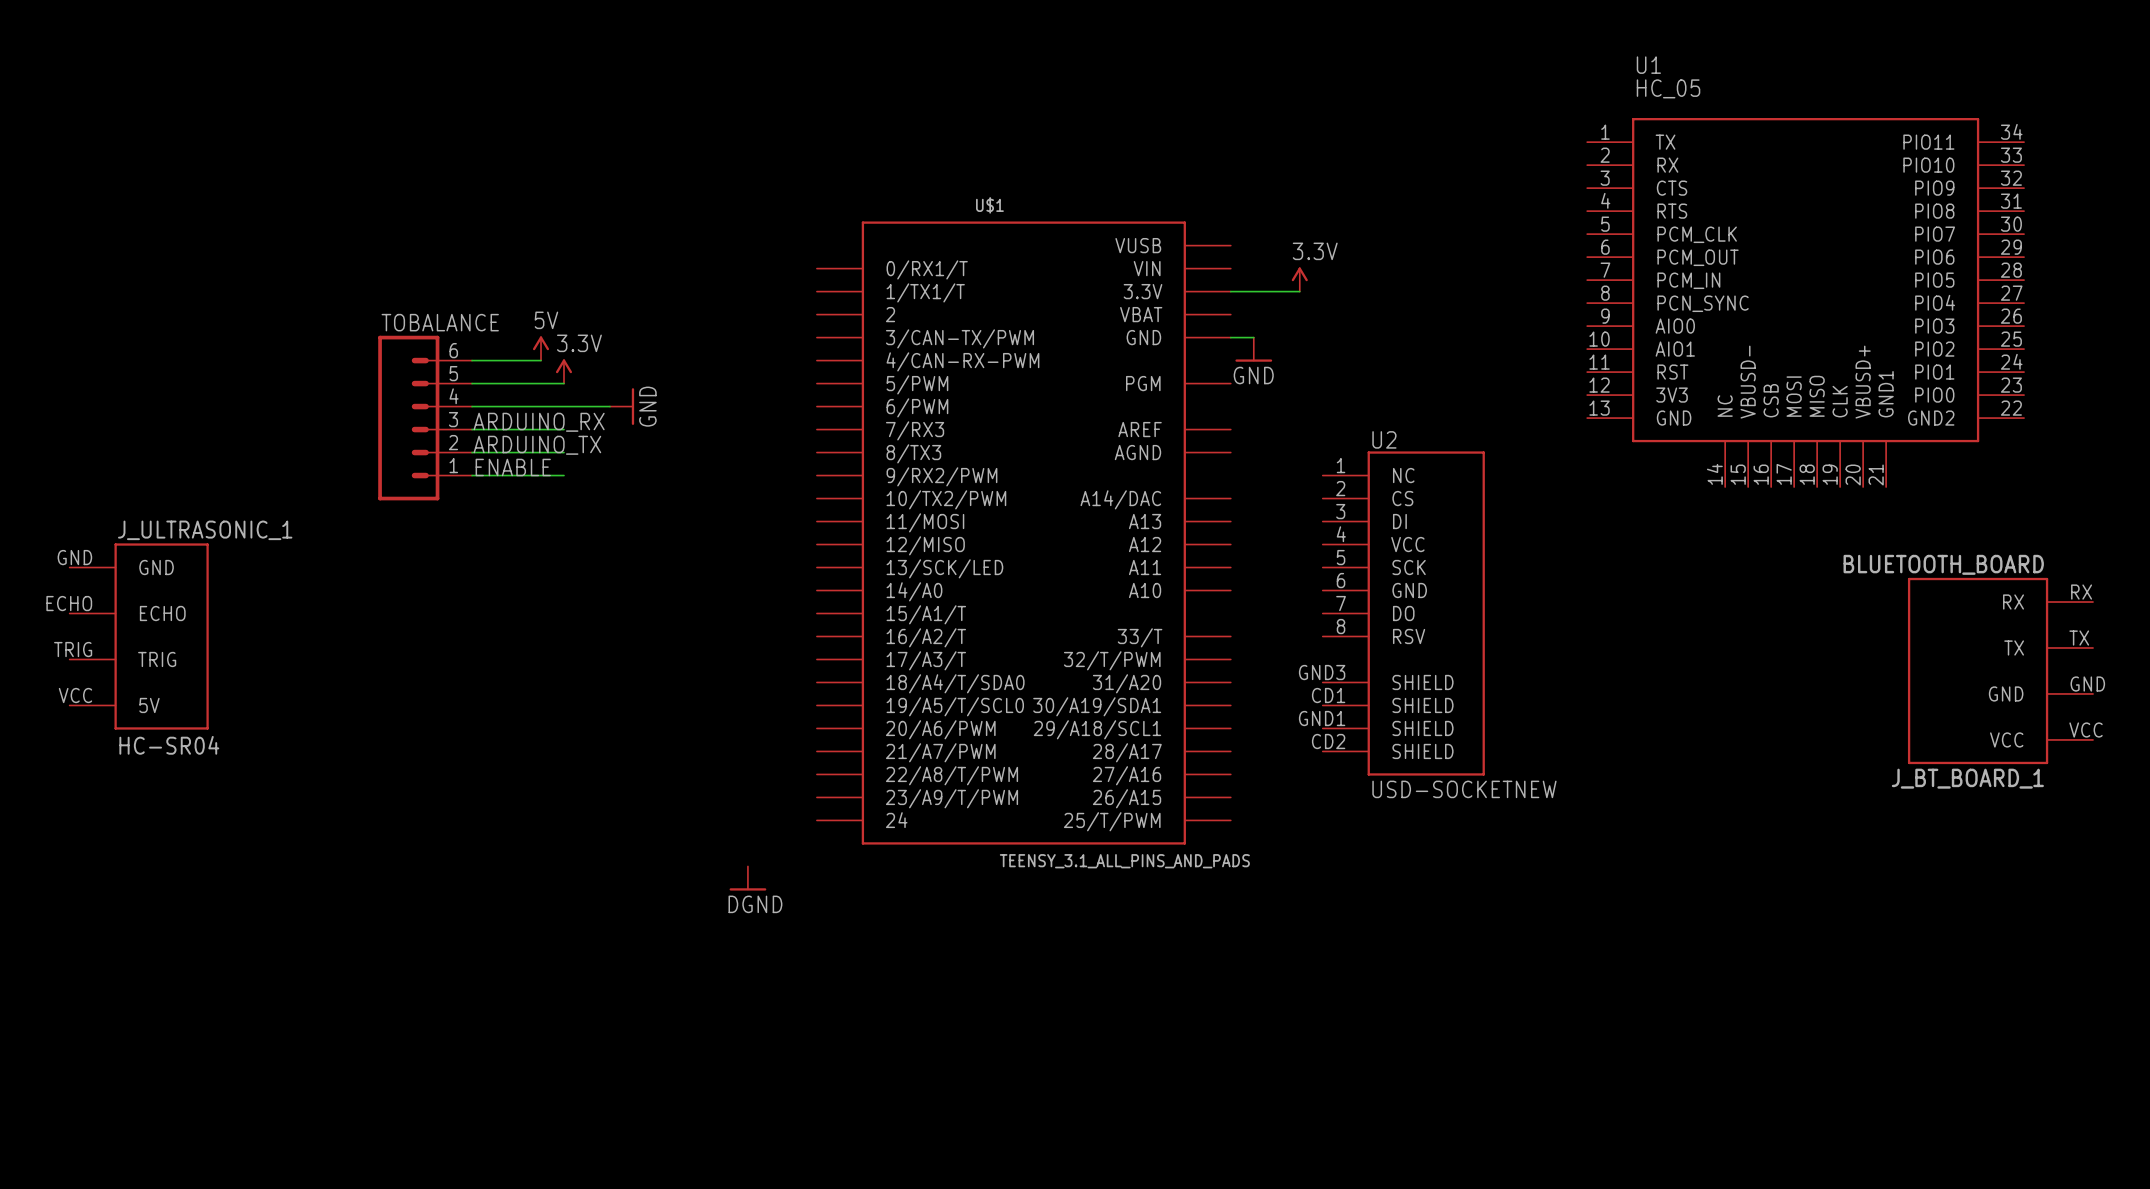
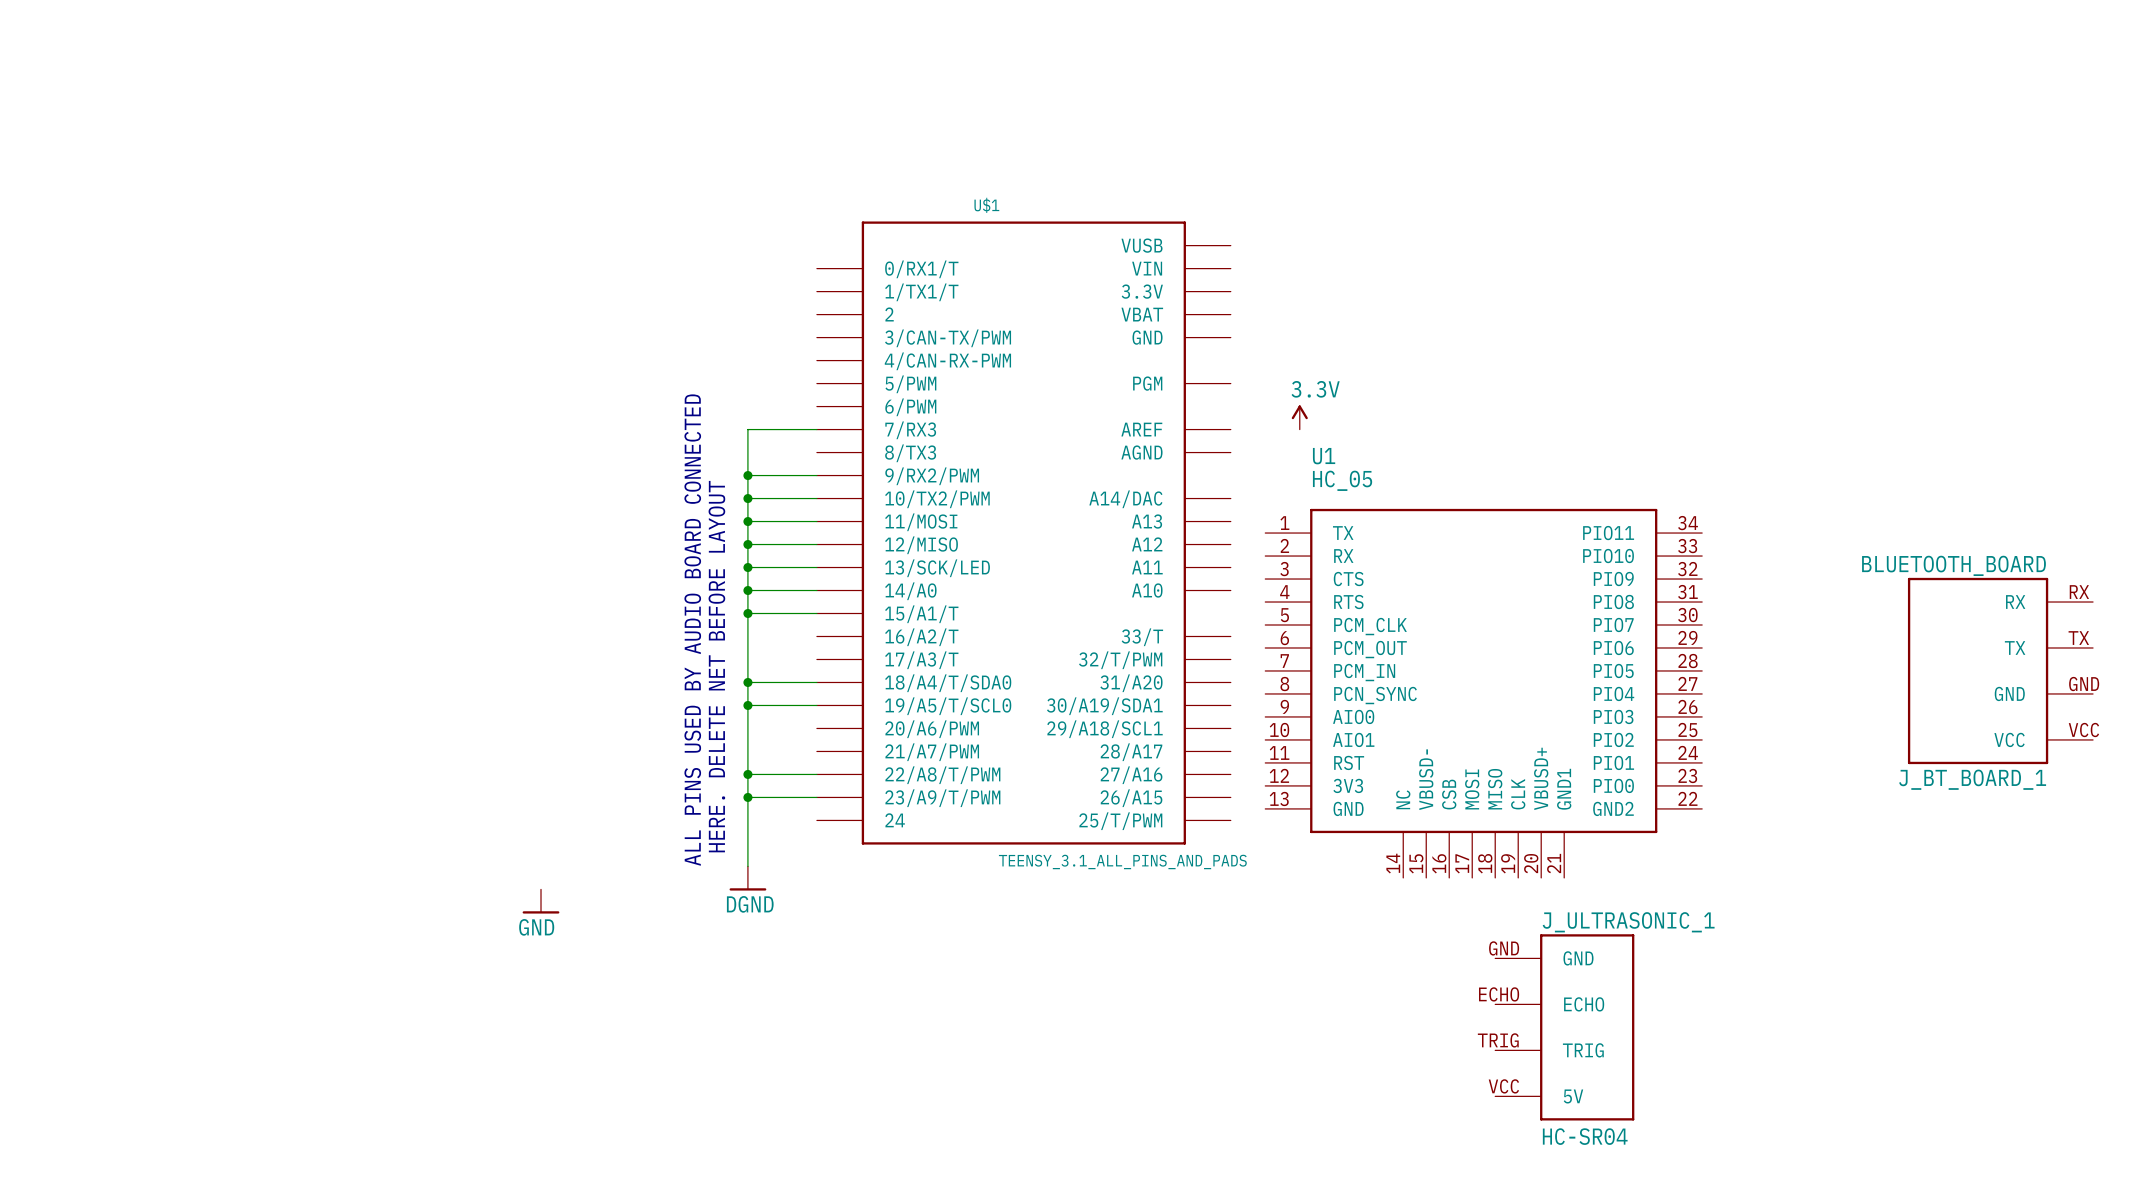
power symbol position: 3.3V (1299, 279) -> 3.3V (1299, 417)
wire: (1230, 291) (1299, 291) -> none
U1 position: (1805, 302) -> (1483, 693)
wire: (1230, 337) (1253, 337) -> none
power symbol: 5V (541, 348) -> none
power symbol: GND (1253, 349) -> none
wire: (472, 360) (541, 360) -> none
power symbol: 3.3V (563, 371) -> none
wire: (472, 383) (563, 383) -> none
wire: (472, 406) (609, 406) -> none
power symbol: GND (622, 406) -> none
TOBALANCE: (425, 418) -> none
label: ARDUINO_RX (539, 422) -> none
wire: (472, 429) (563, 429) -> none
wire: none -> (816, 429) (747, 429) (747, 866)
label: ARDUINO_TX (537, 445) -> none
wire: (472, 452) (563, 452) -> none
label: ENABLE (513, 467) -> none
wire: (472, 475) (563, 475) -> none
wire: none -> (747, 475) (816, 475)
junction: none -> (747, 475)
wire: none -> (747, 498) (816, 498)
junction: none -> (747, 498)
wire: none -> (747, 521) (816, 521)
junction: none -> (747, 521)
wire: none -> (747, 544) (816, 544)
junction: none -> (747, 544)
wire: none -> (747, 567) (816, 567)
junction: none -> (747, 567)
wire: none -> (747, 590) (816, 590)
junction: none -> (747, 590)
wire: none -> (747, 613) (816, 613)
junction: none -> (747, 613)
U2: USD-SOCKETNEW (1403, 613) -> none
text: none -> ALL PINS USED BY AUDIO BOARD CONNECTED (692, 630)
J_ULTRASONIC_1 position: (139, 636) -> (1564, 1027)
text: none -> HERE. DELETE NET BEFORE LAYOUT (716, 666)
wire: none -> (747, 682) (816, 682)
junction: none -> (747, 682)
wire: none -> (747, 705) (816, 705)
junction: none -> (747, 705)
wire: none -> (747, 774) (816, 774)
junction: none -> (747, 774)
wire: none -> (747, 797) (816, 797)
junction: none -> (747, 797)
power symbol: none -> GND (541, 901)

